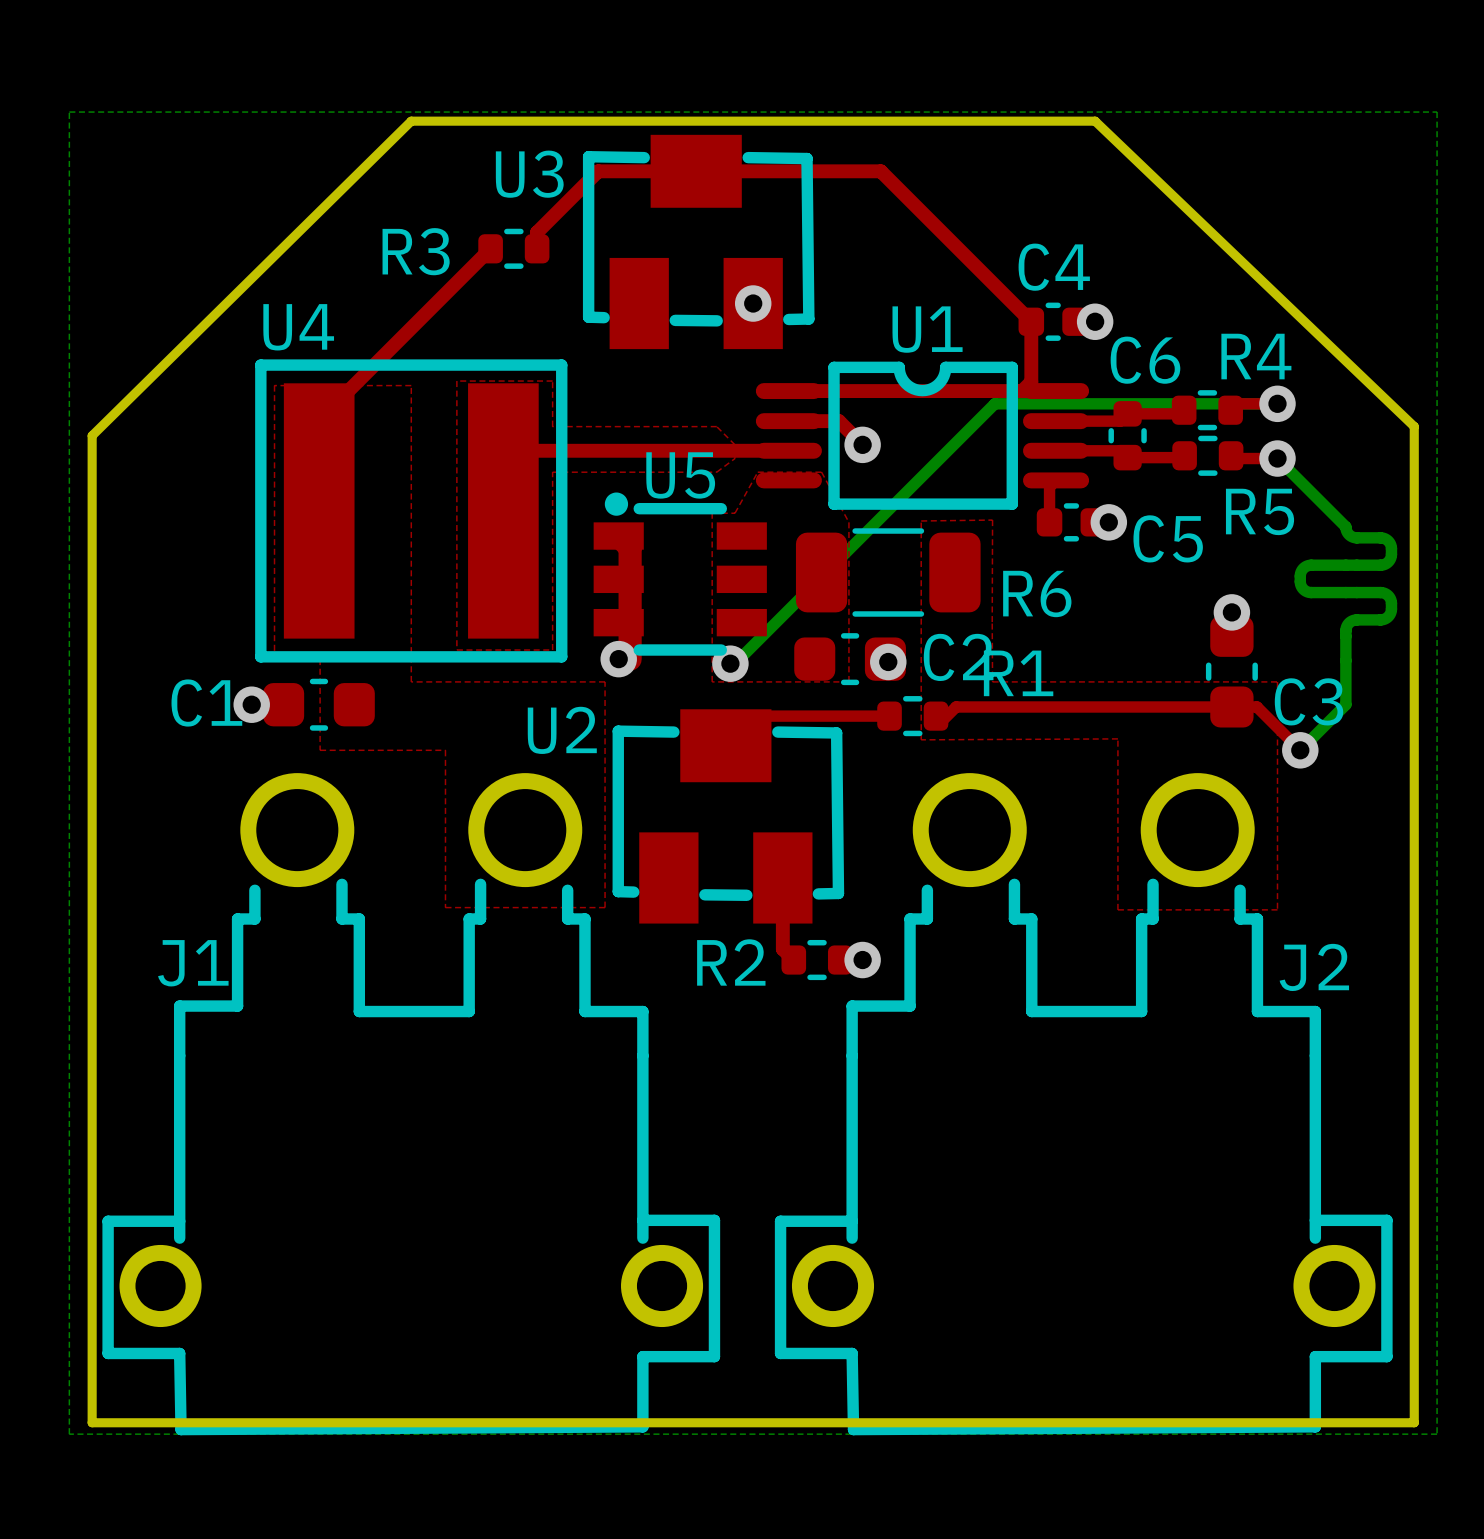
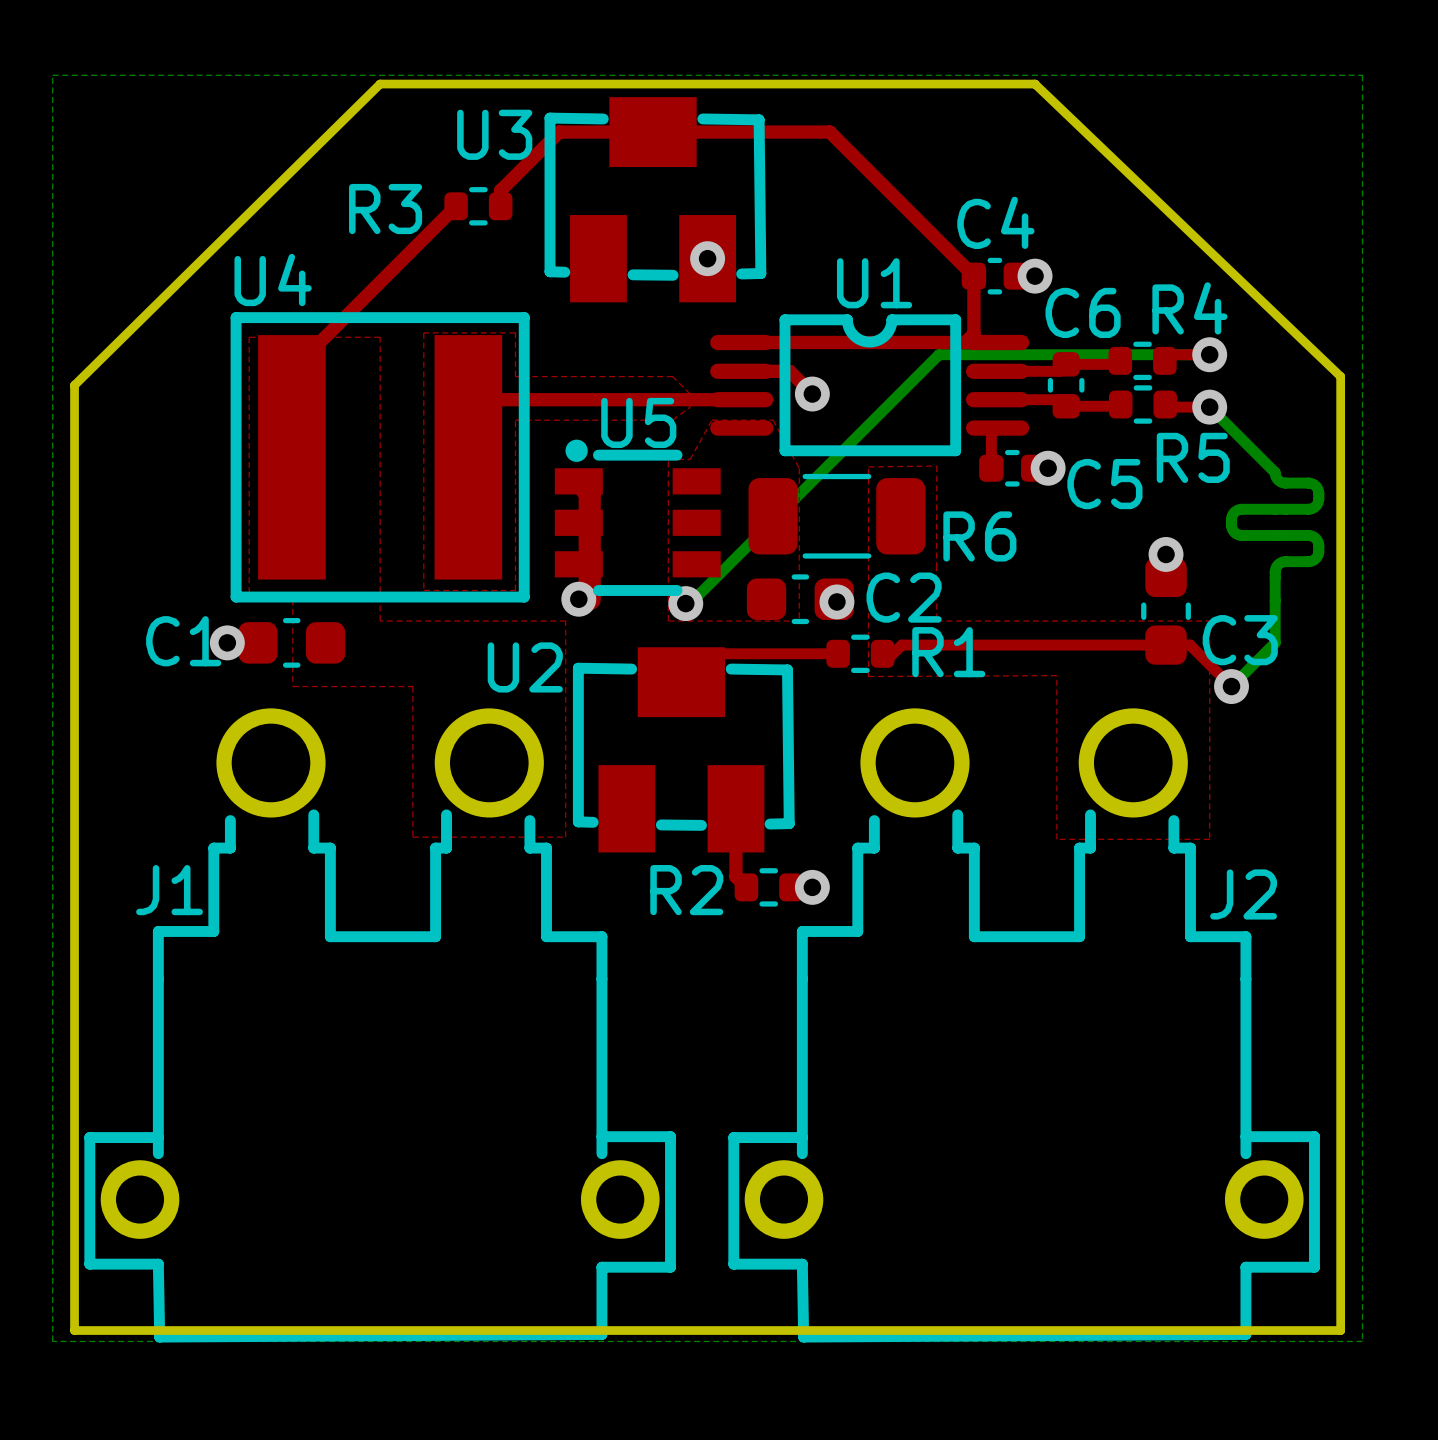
R1 name position: R1 (1018, 673) -> R1 (948, 652)

